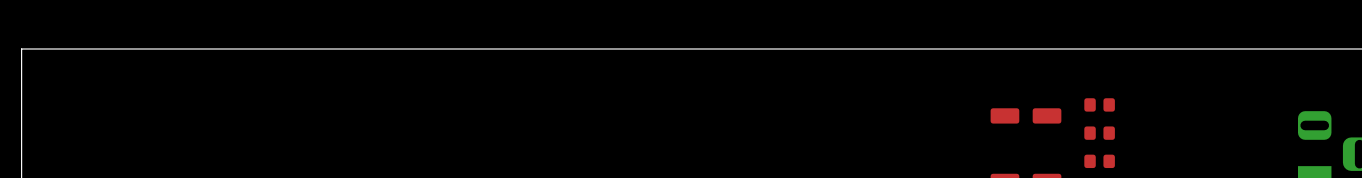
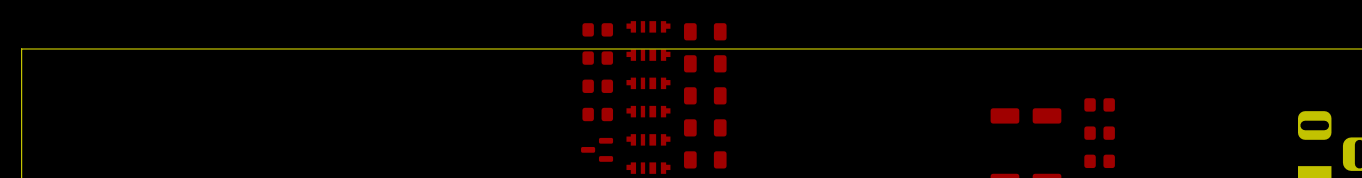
part: none -> (648, 26)
part: none -> (597, 29)
part: none -> (705, 31)
part: none -> (648, 55)
part: none -> (597, 58)
part: none -> (705, 63)
part: none -> (648, 83)
part: none -> (597, 86)
part: none -> (705, 95)
part: none -> (648, 111)
part: none -> (597, 114)
part: none -> (705, 127)
part: none -> (648, 139)
part: none -> (597, 149)
part: none -> (705, 159)
part: none -> (648, 168)

